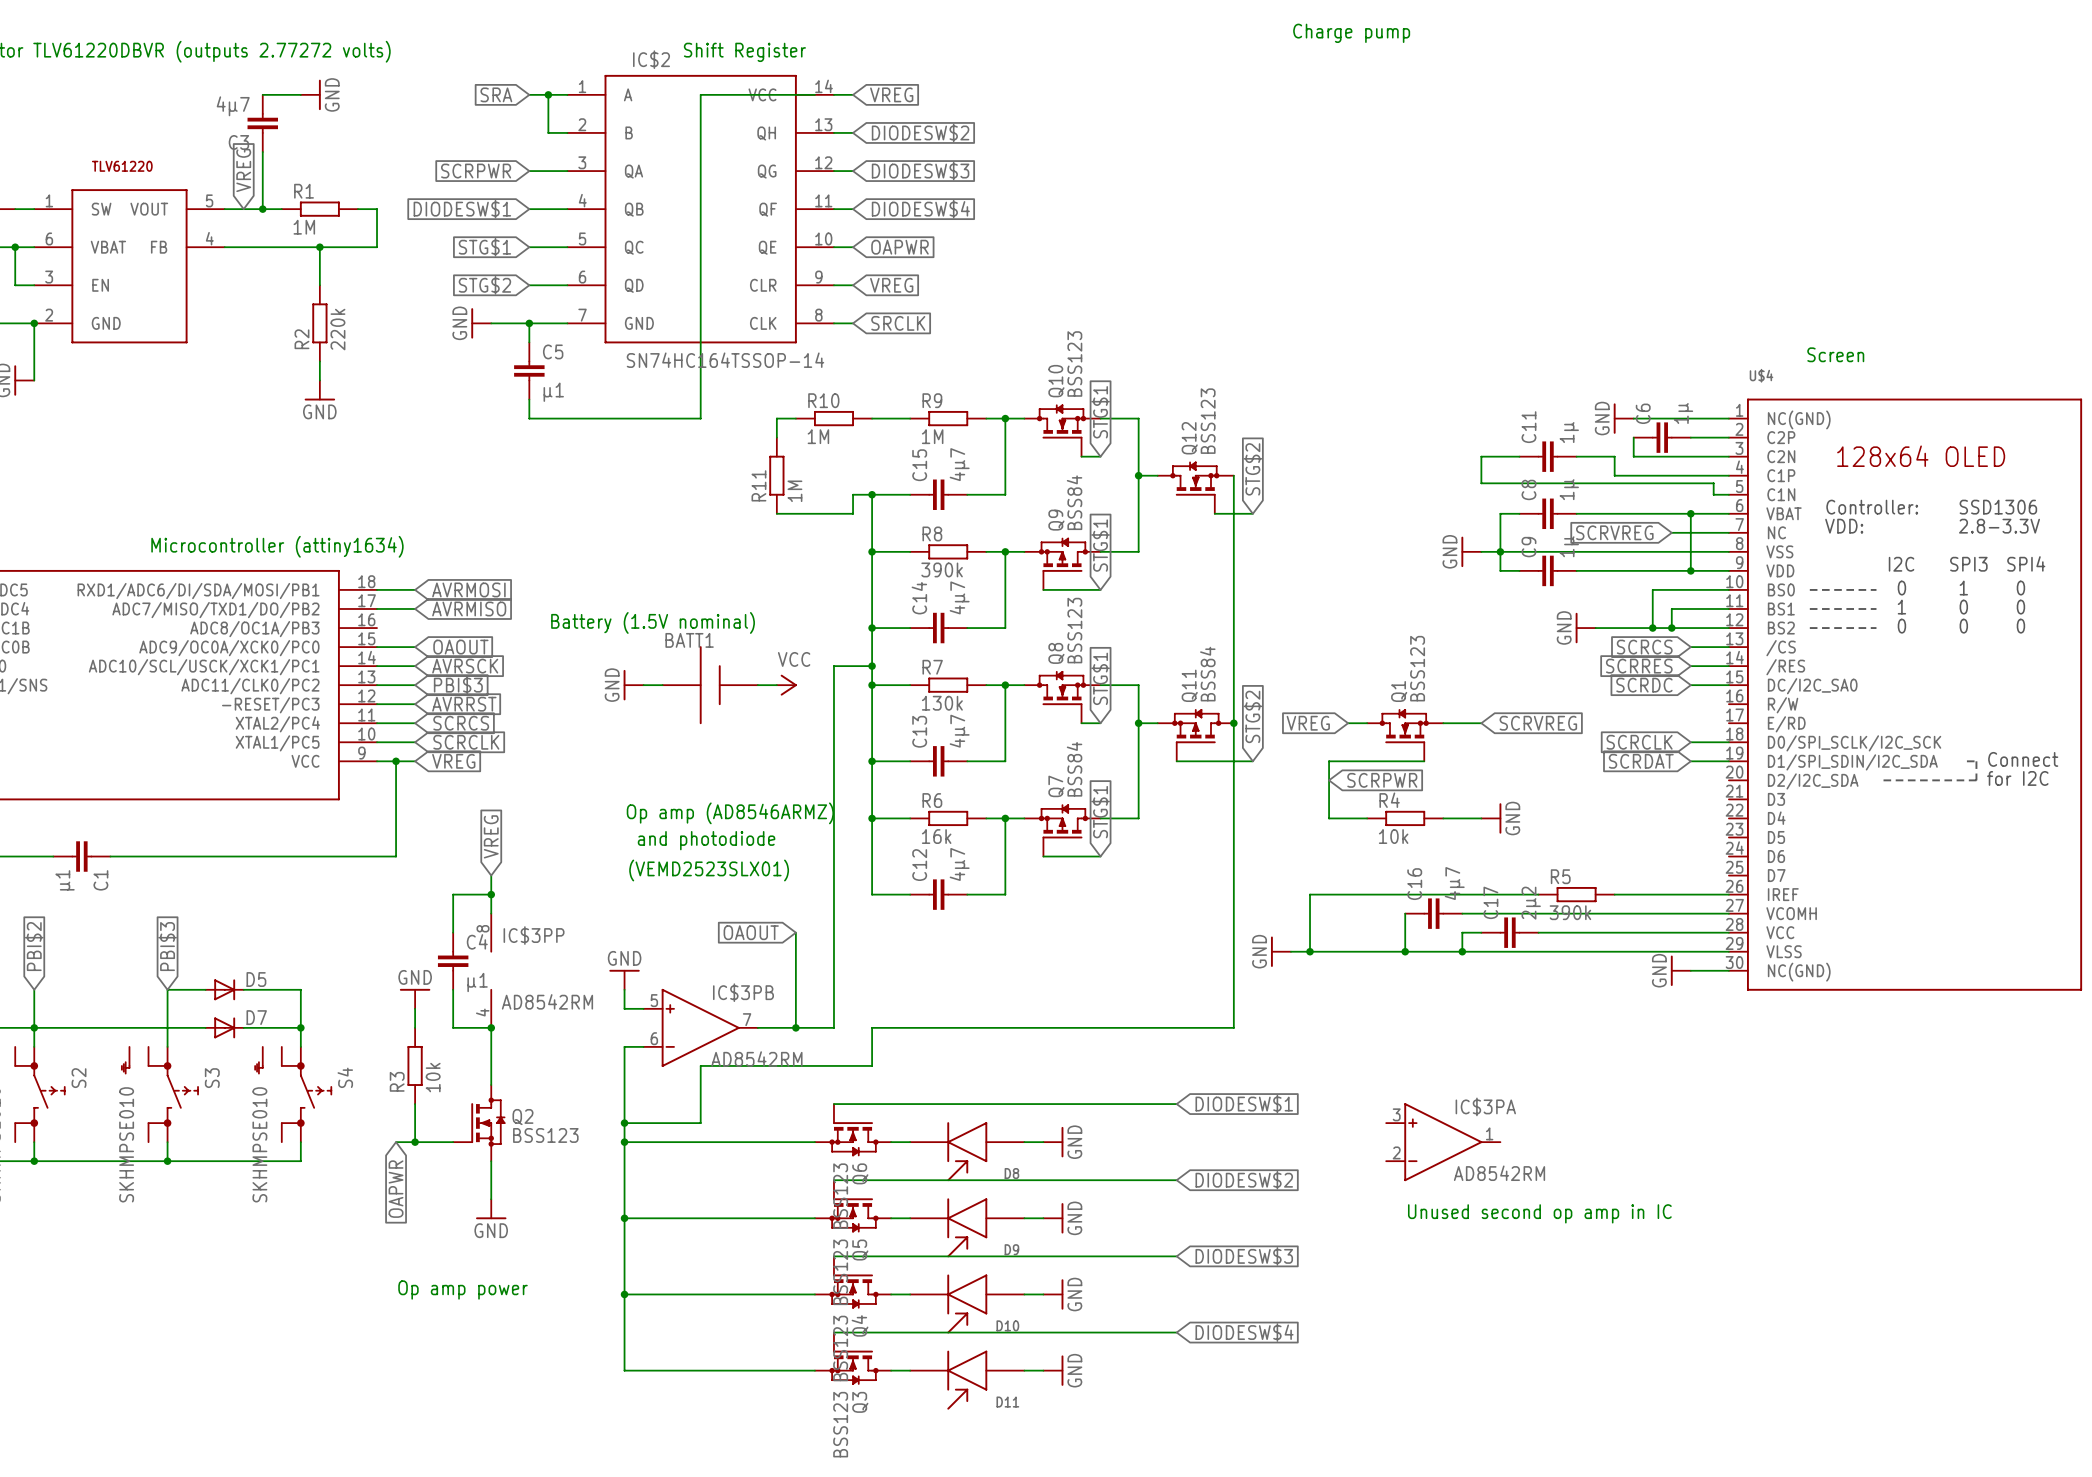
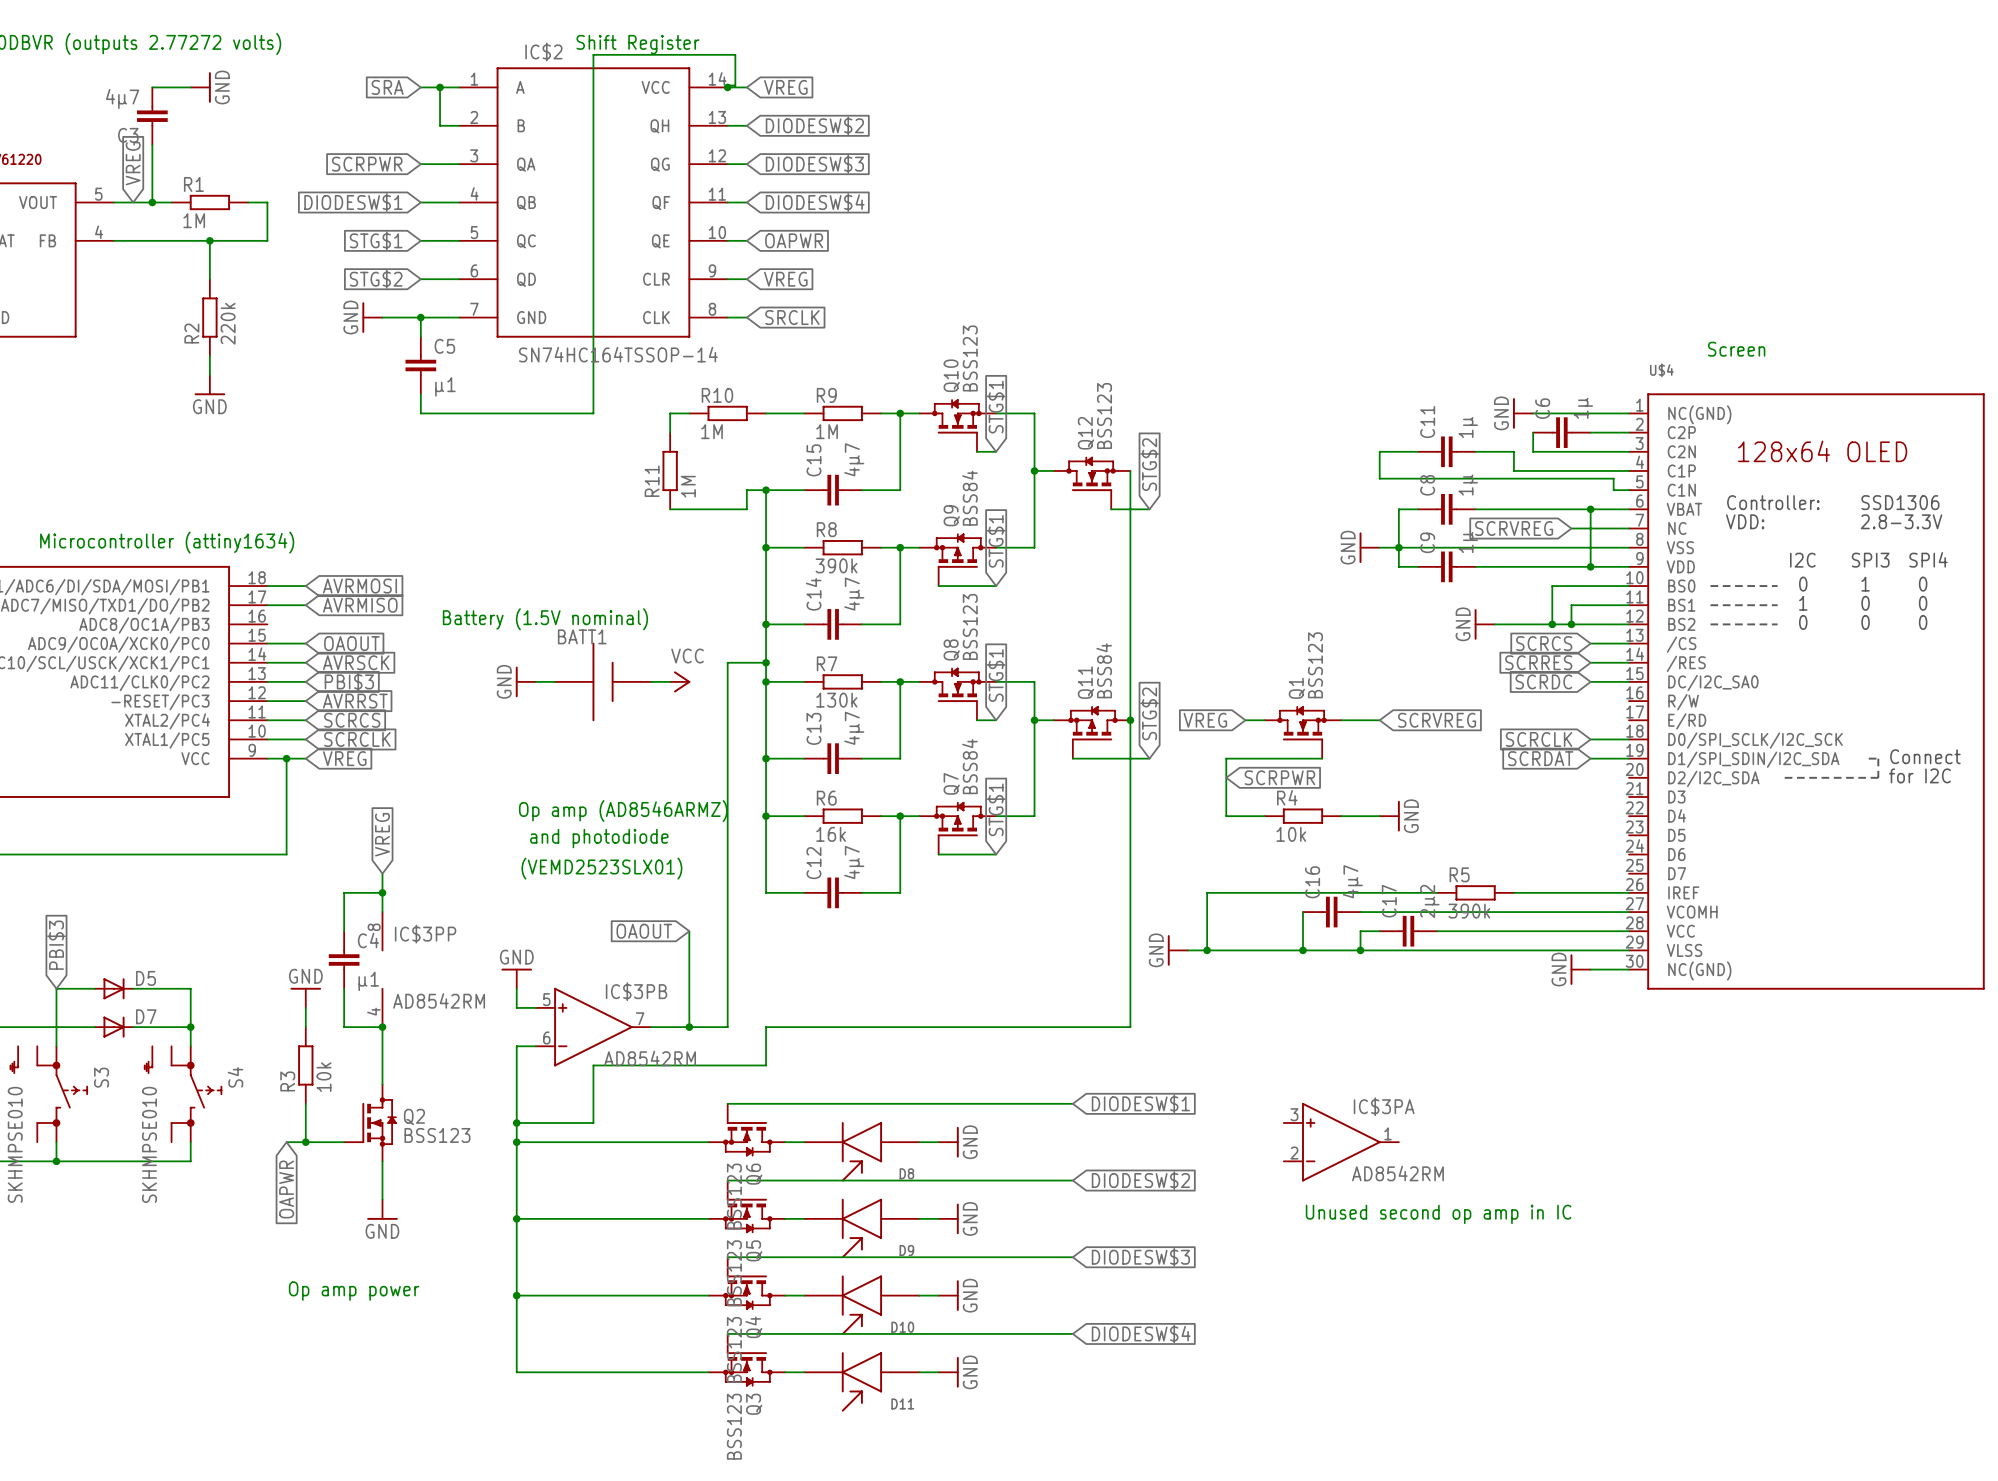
text: Charge pump (1351, 33) -> none
wire: (700, 94) (814, 94) -> (593, 87) (593, 54) (735, 54) (735, 85) (727, 85) (727, 87)
junction: none -> (727, 87)

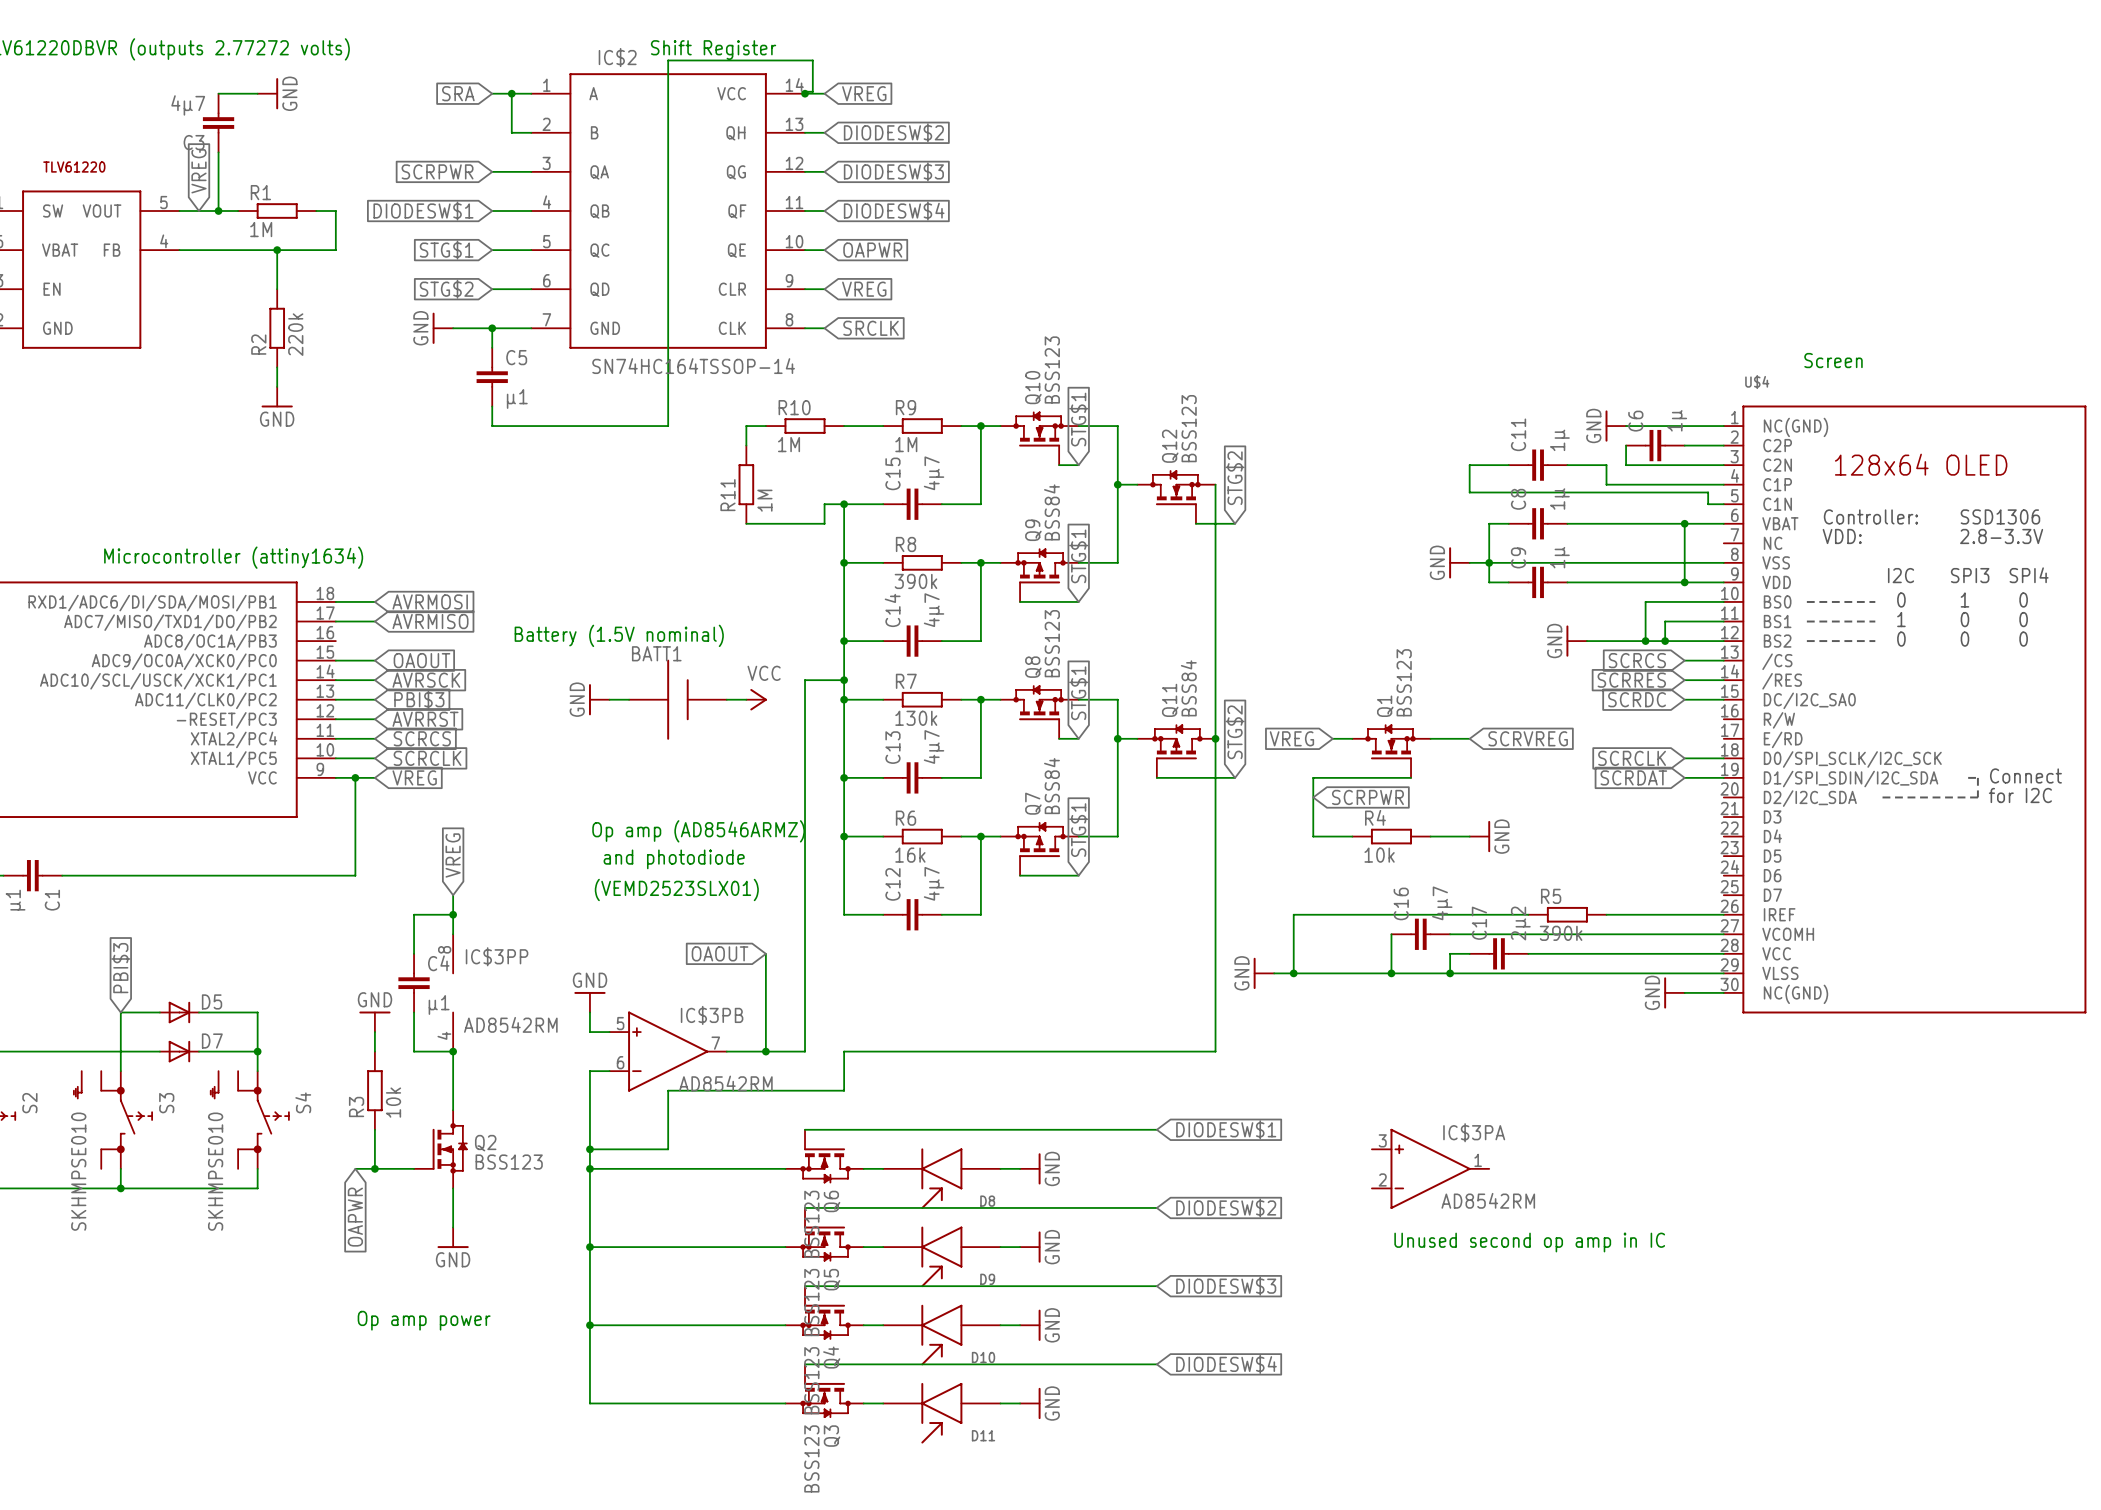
global label: SCRVREG (1514, 528) -> none
wire: (1571, 528) (1629, 528) -> none

